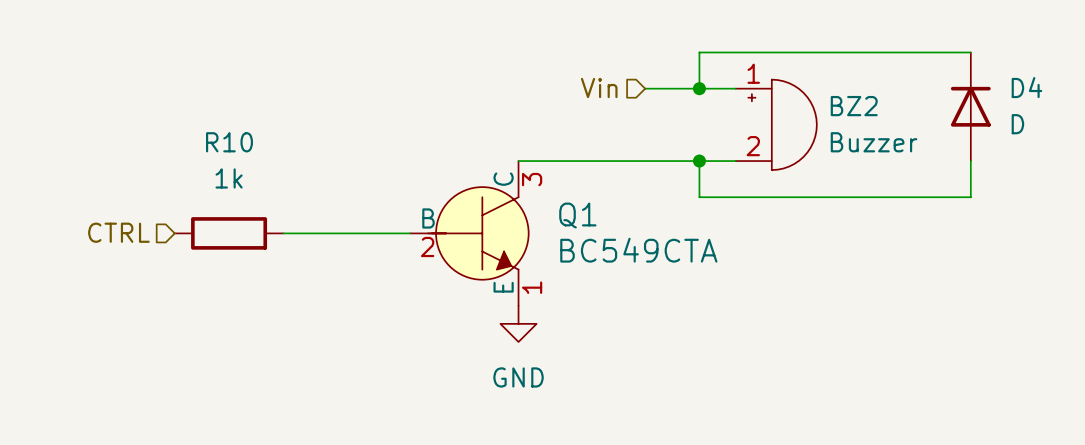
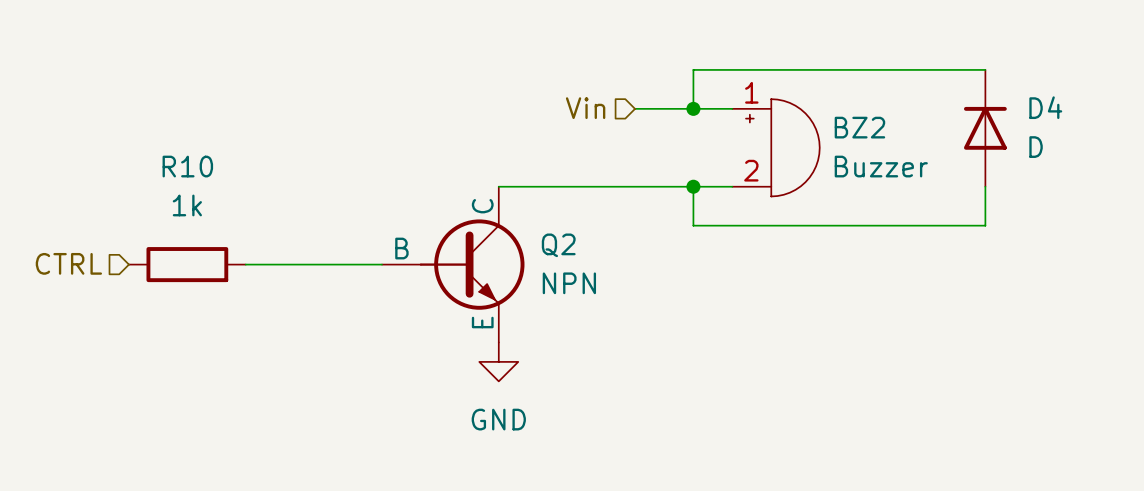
Q1: BC549CTA (469, 233) -> none
Q2: none -> NPN (453, 264)

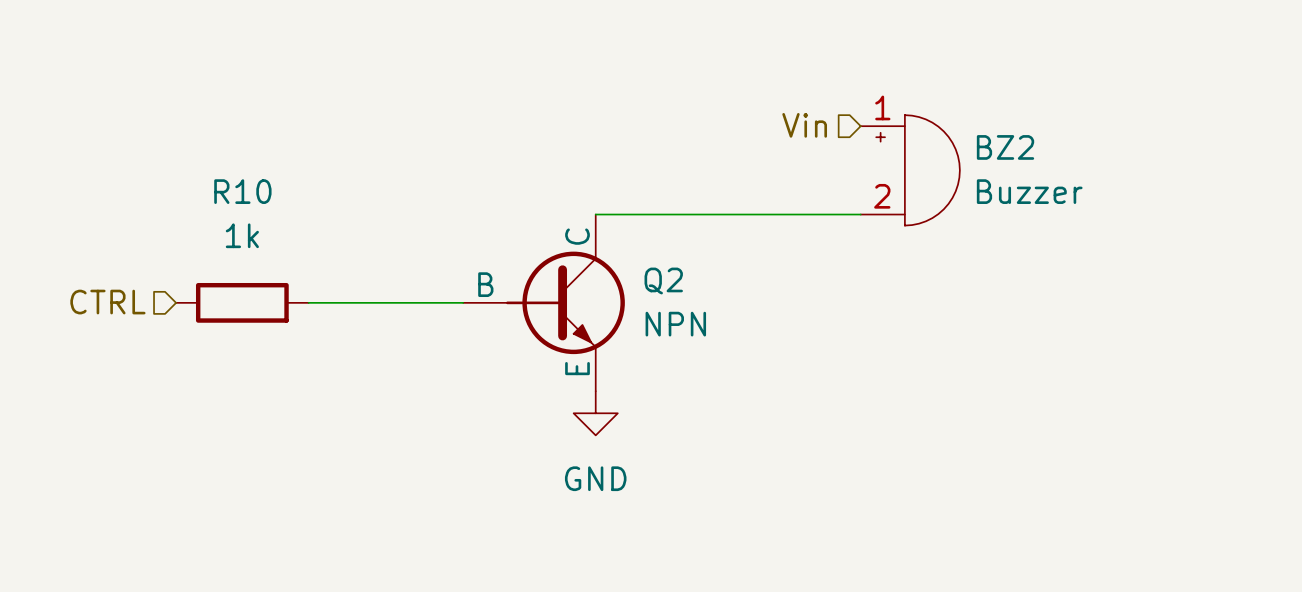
wire: (985, 69) (693, 69) (693, 108) -> none
hierarchical label position: Vin (585, 108) -> Vin (804, 125)
wire: (635, 108) (732, 108) -> none
junction: (693, 108) -> none
D4: D (985, 128) -> none
wire: (693, 186) (693, 225) (985, 225) (985, 186) -> none
junction: (693, 186) -> none

